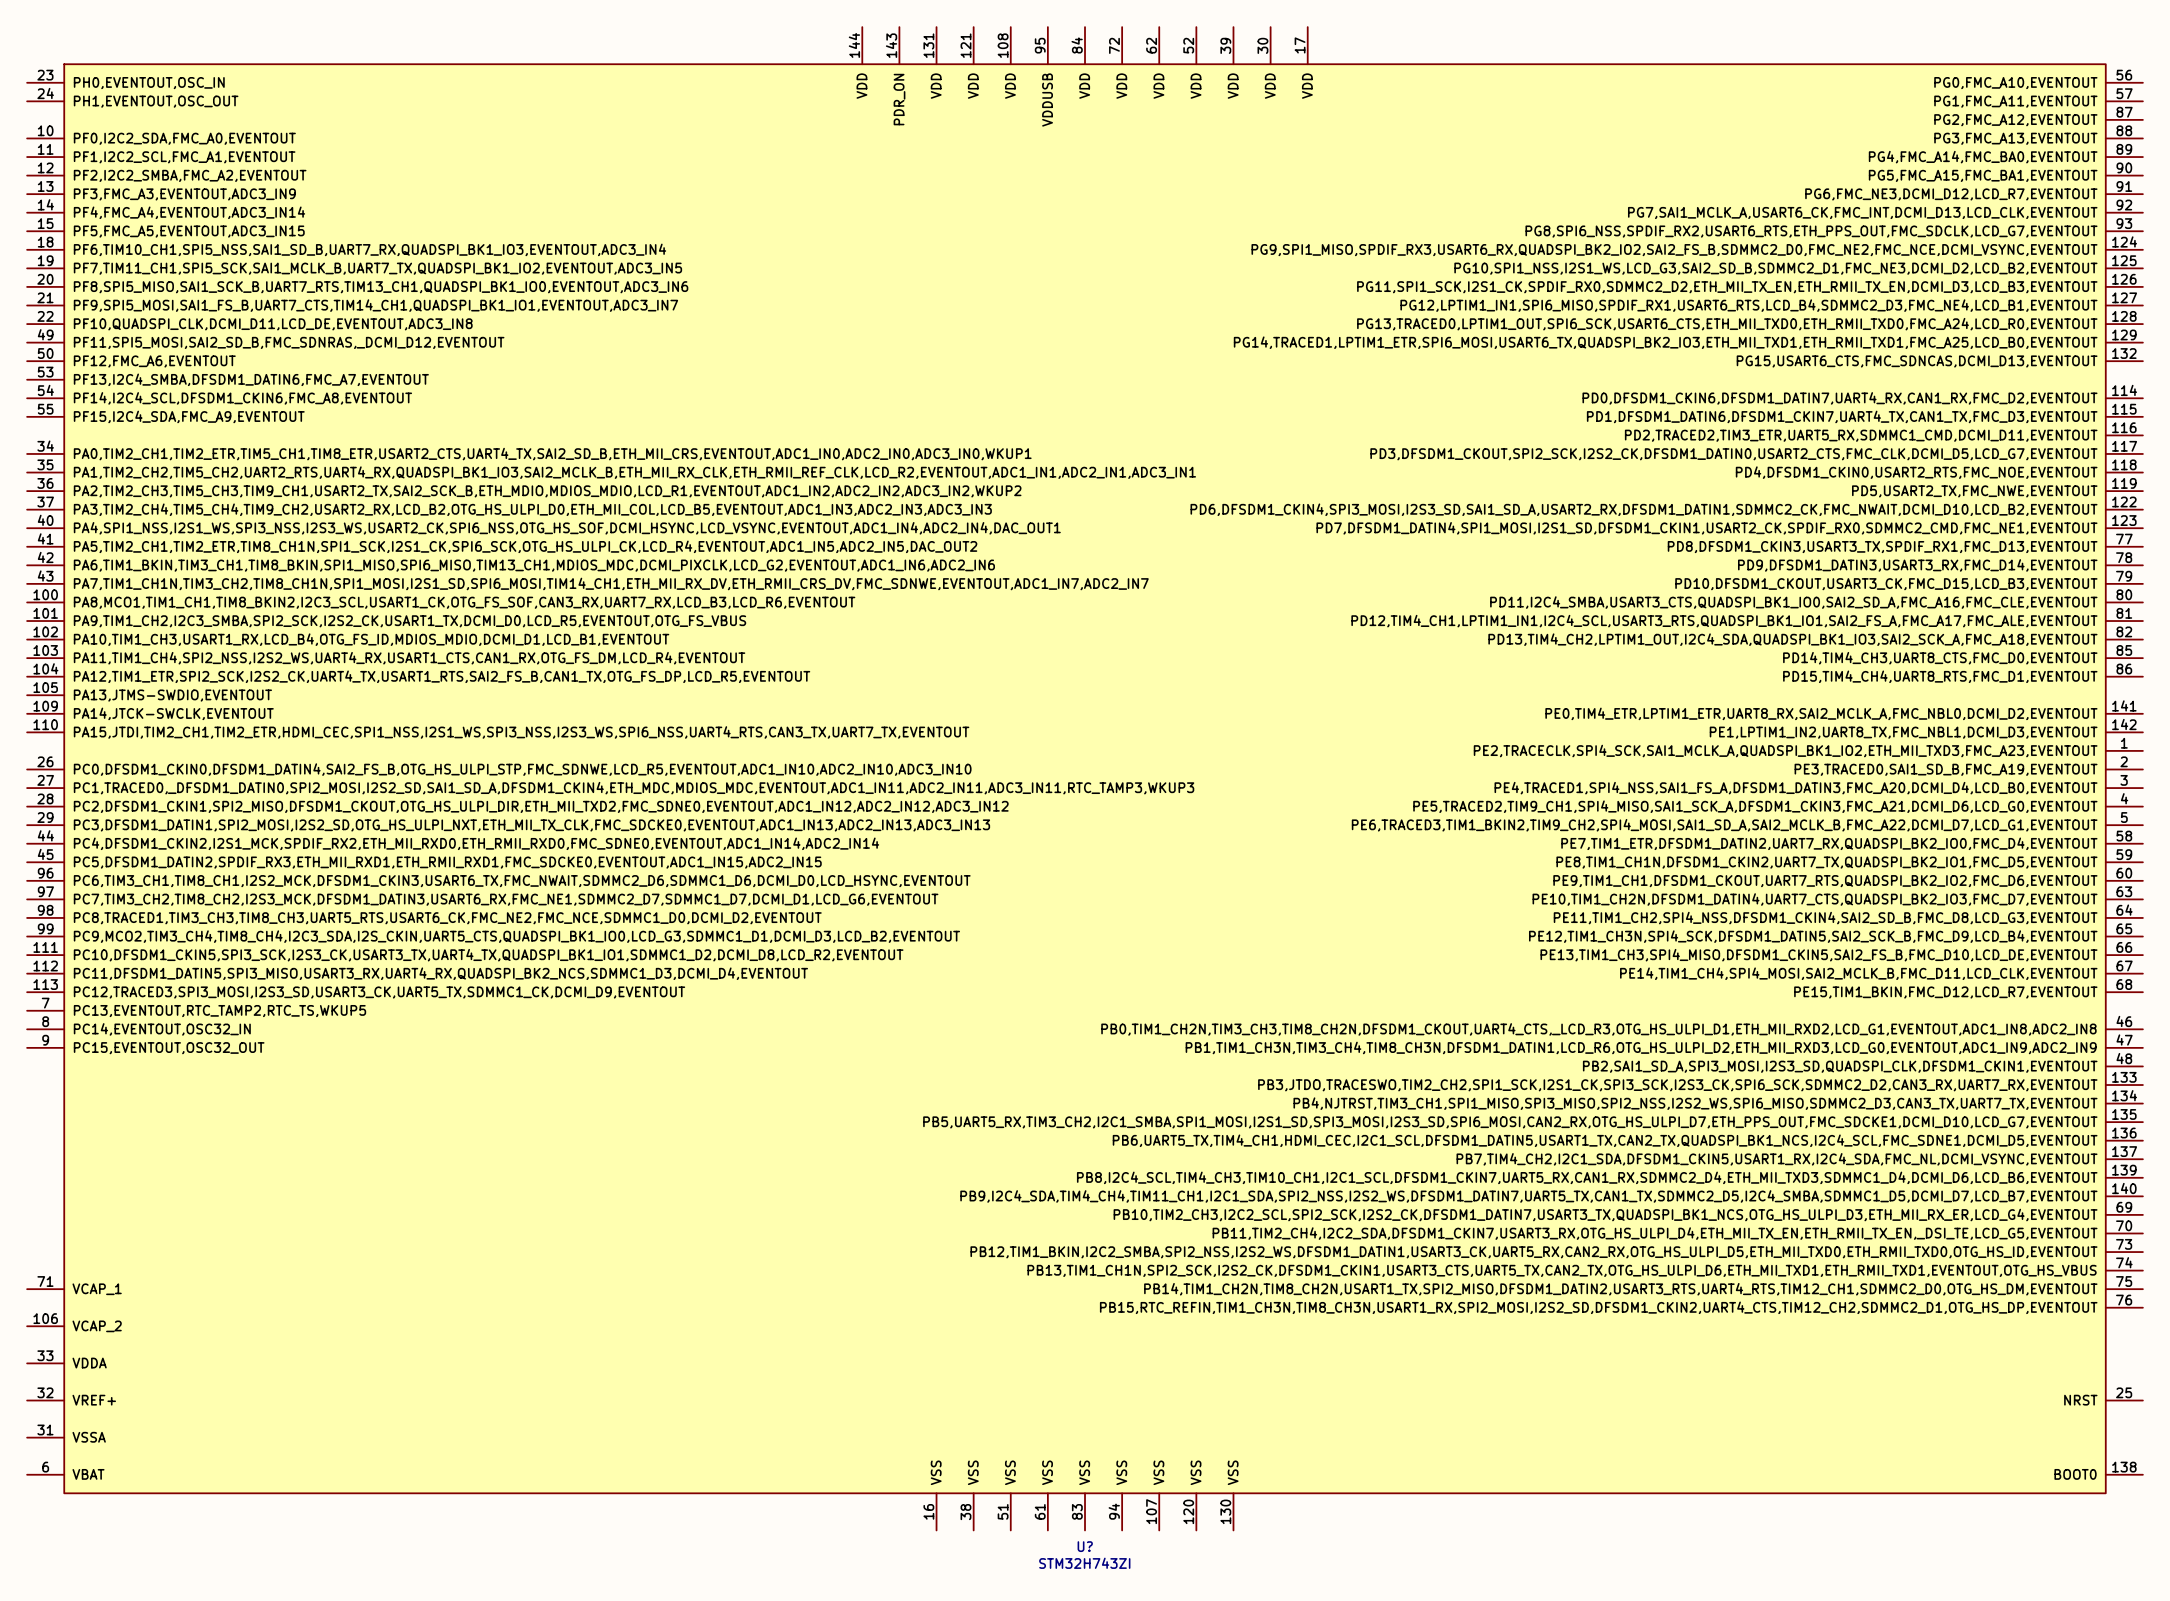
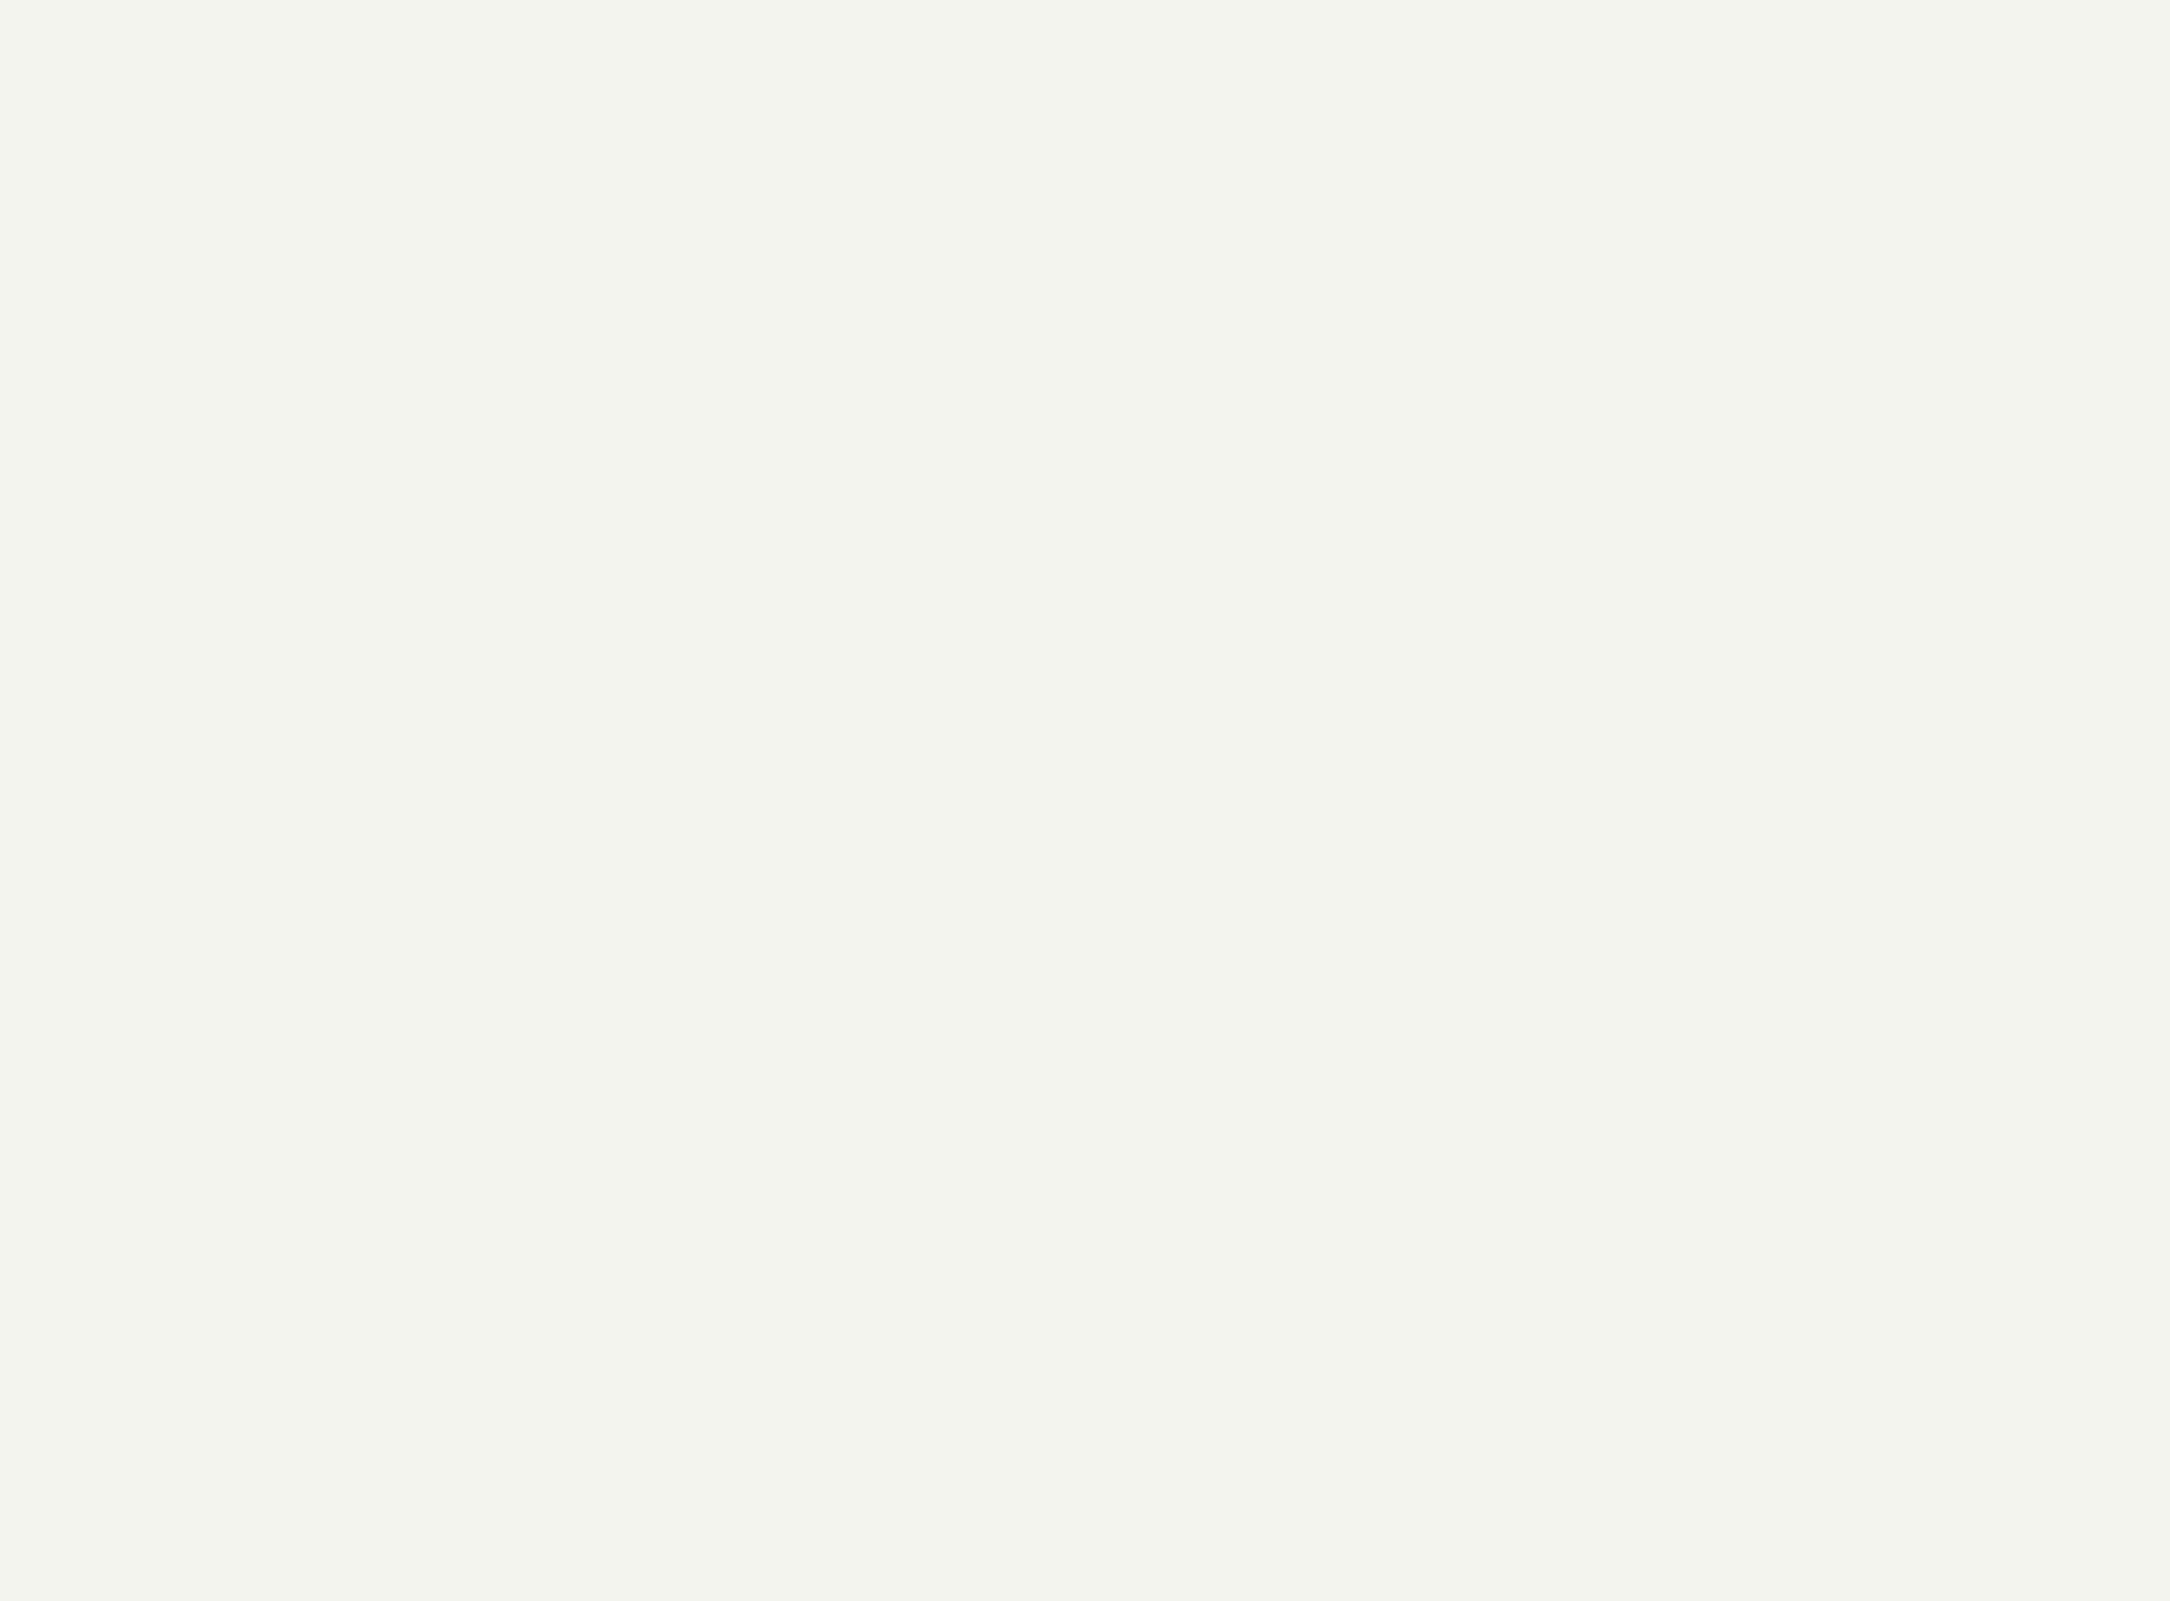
U?: STM32H743ZI (1085, 778) -> none

